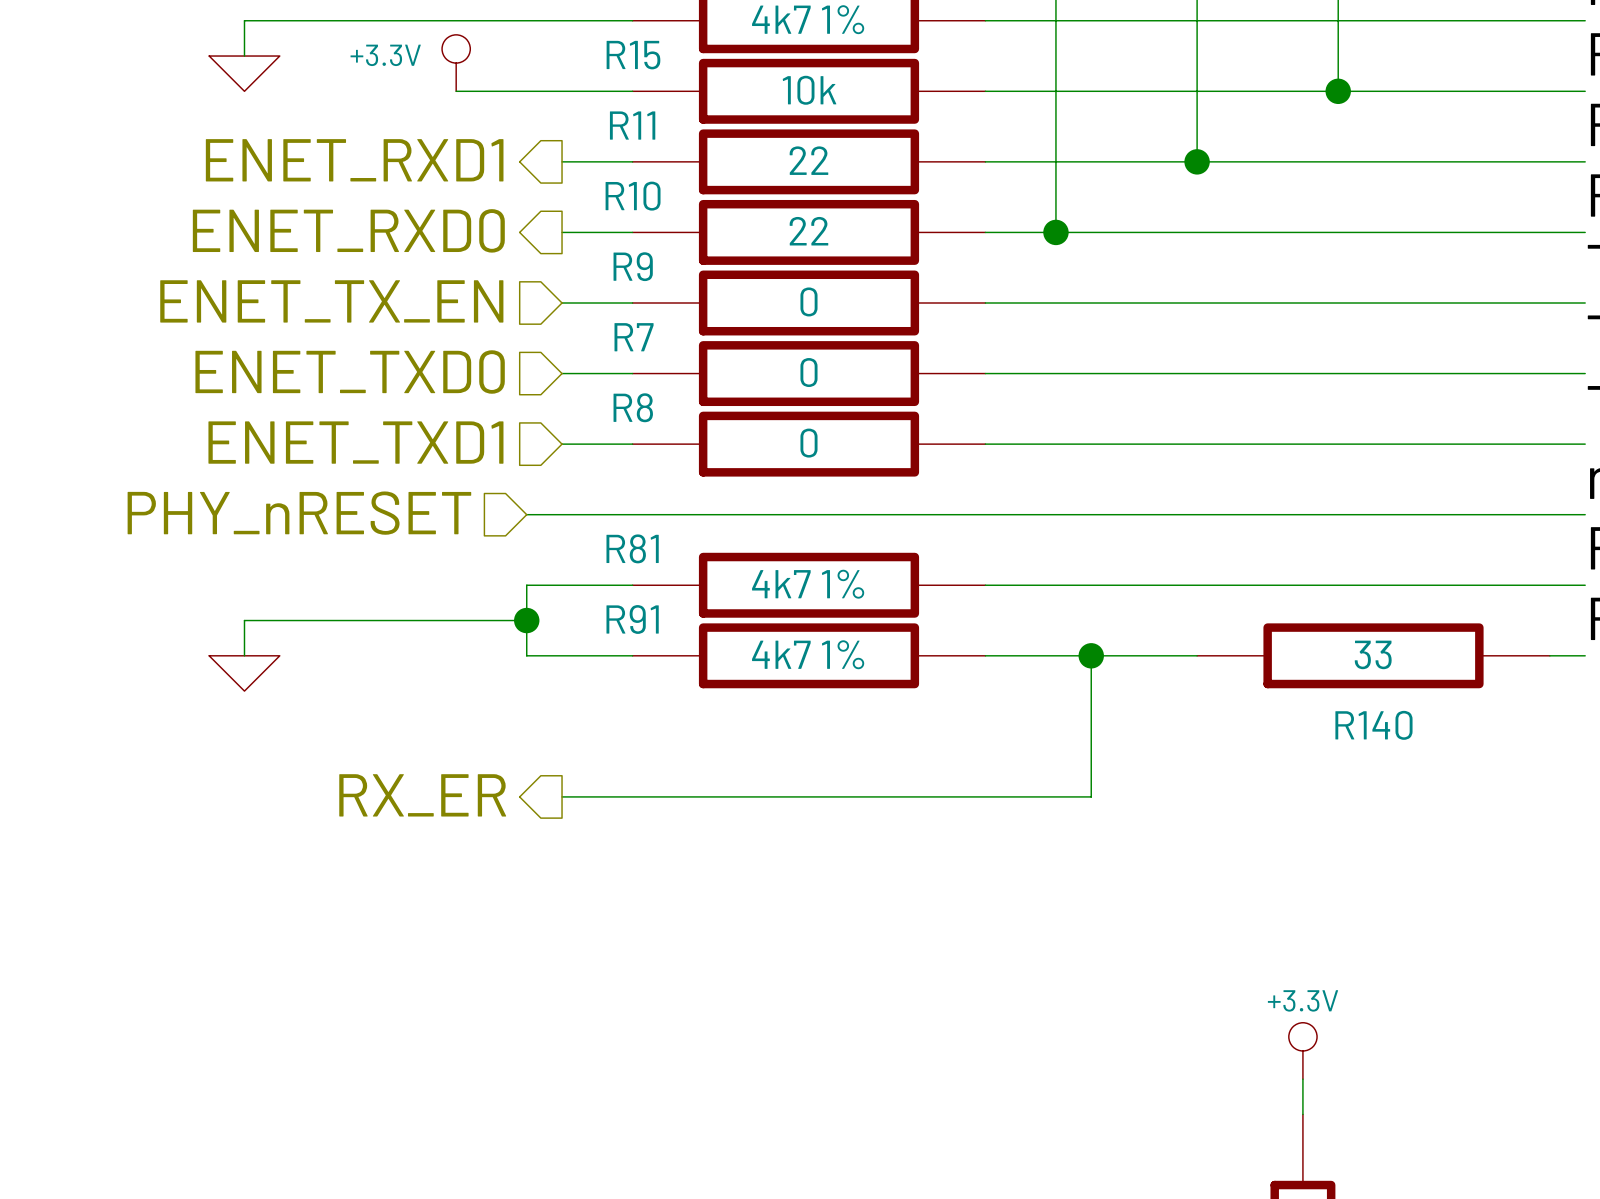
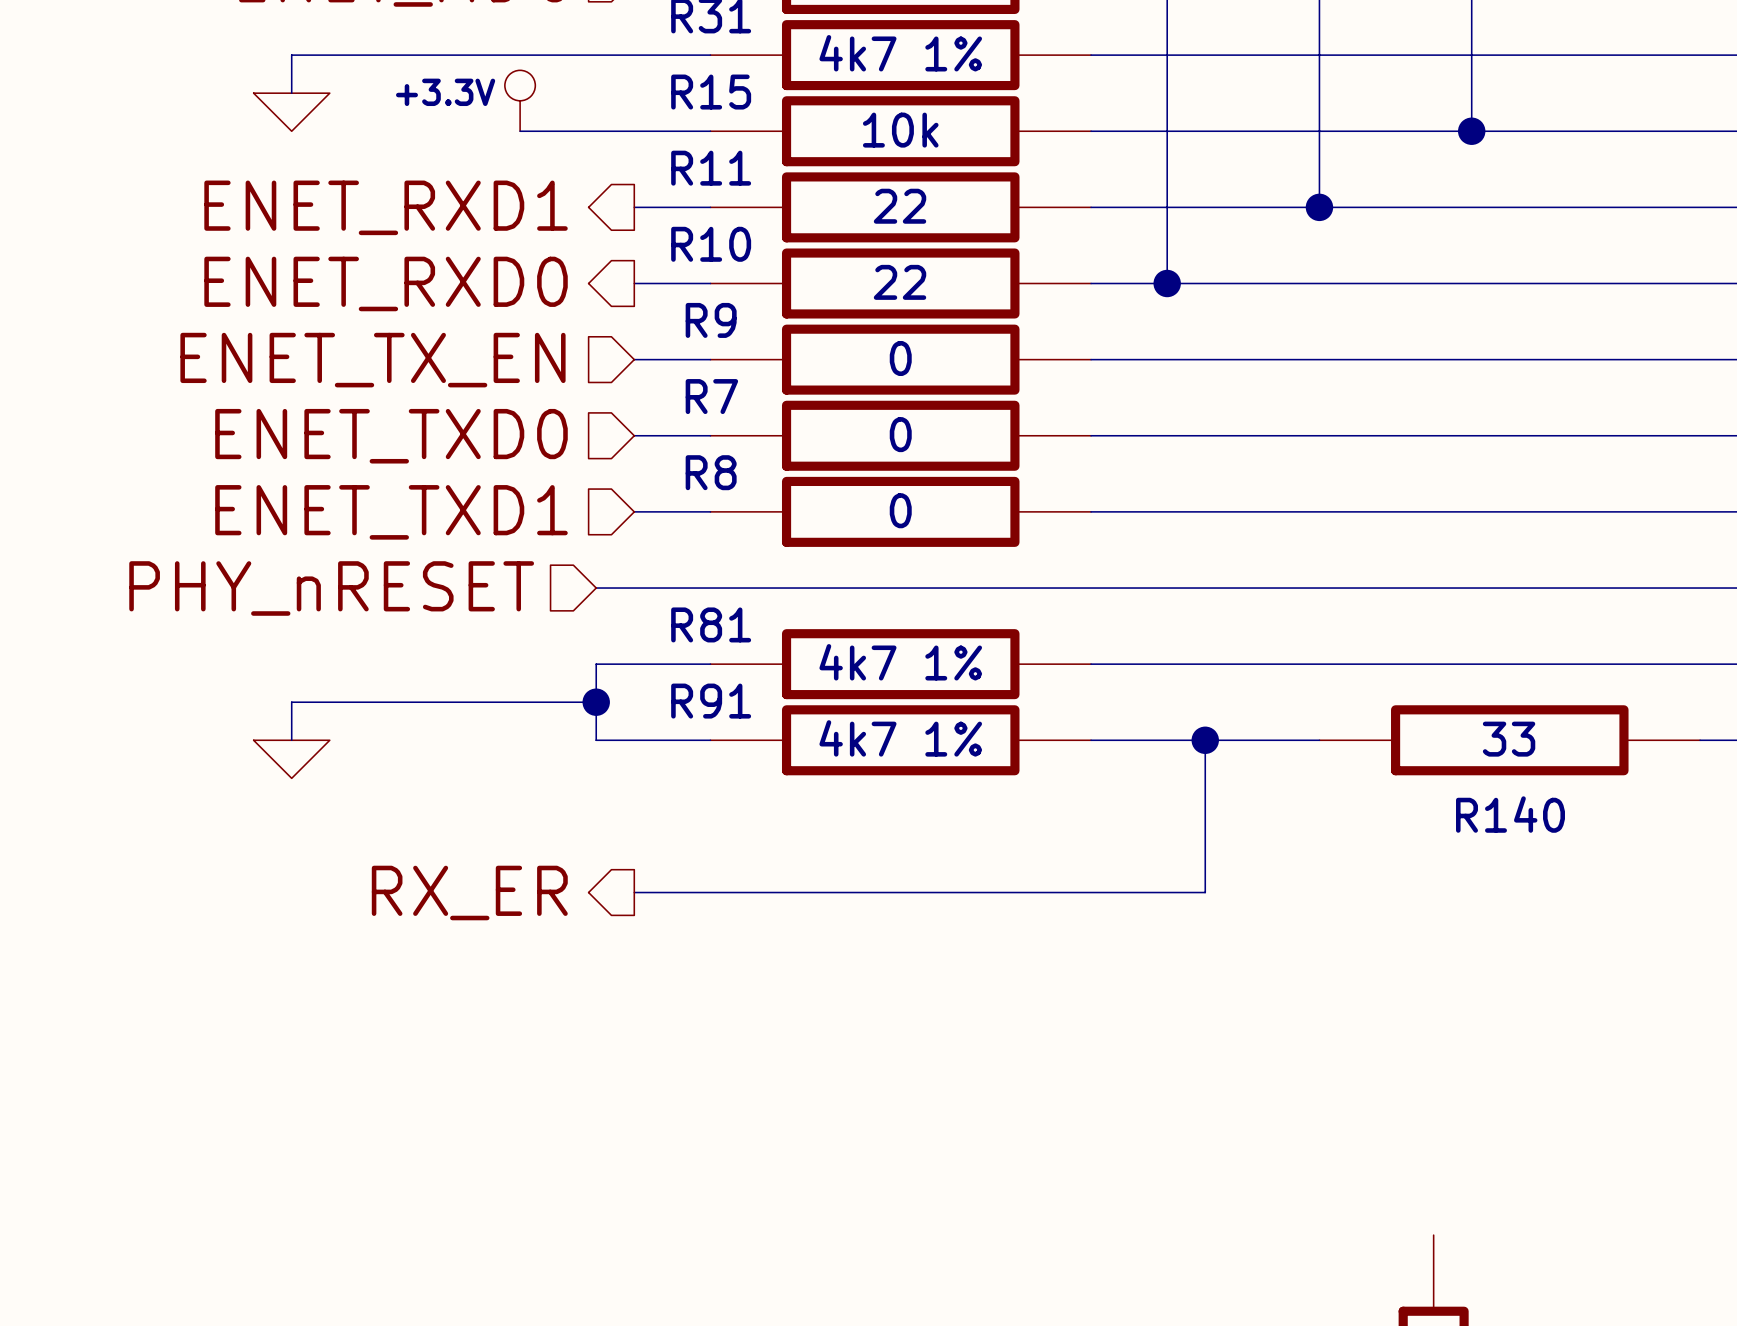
power symbol: +3.3V (1302, 1050) -> none
wire: (1302, 1079) (1302, 1114) -> none

